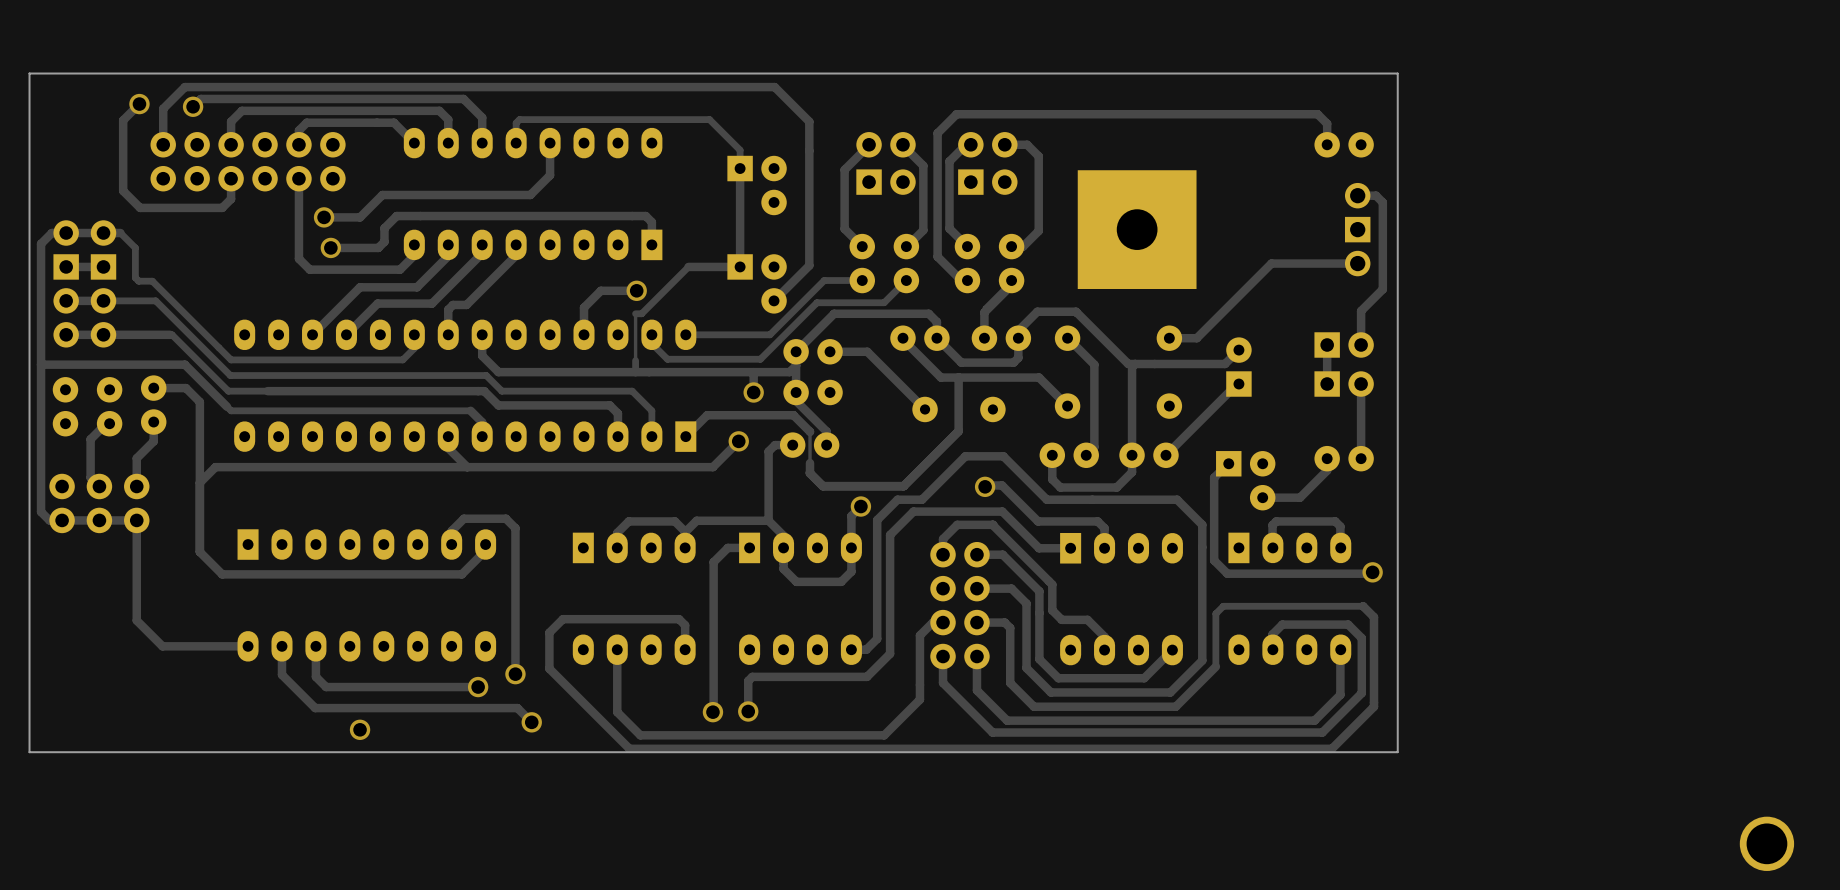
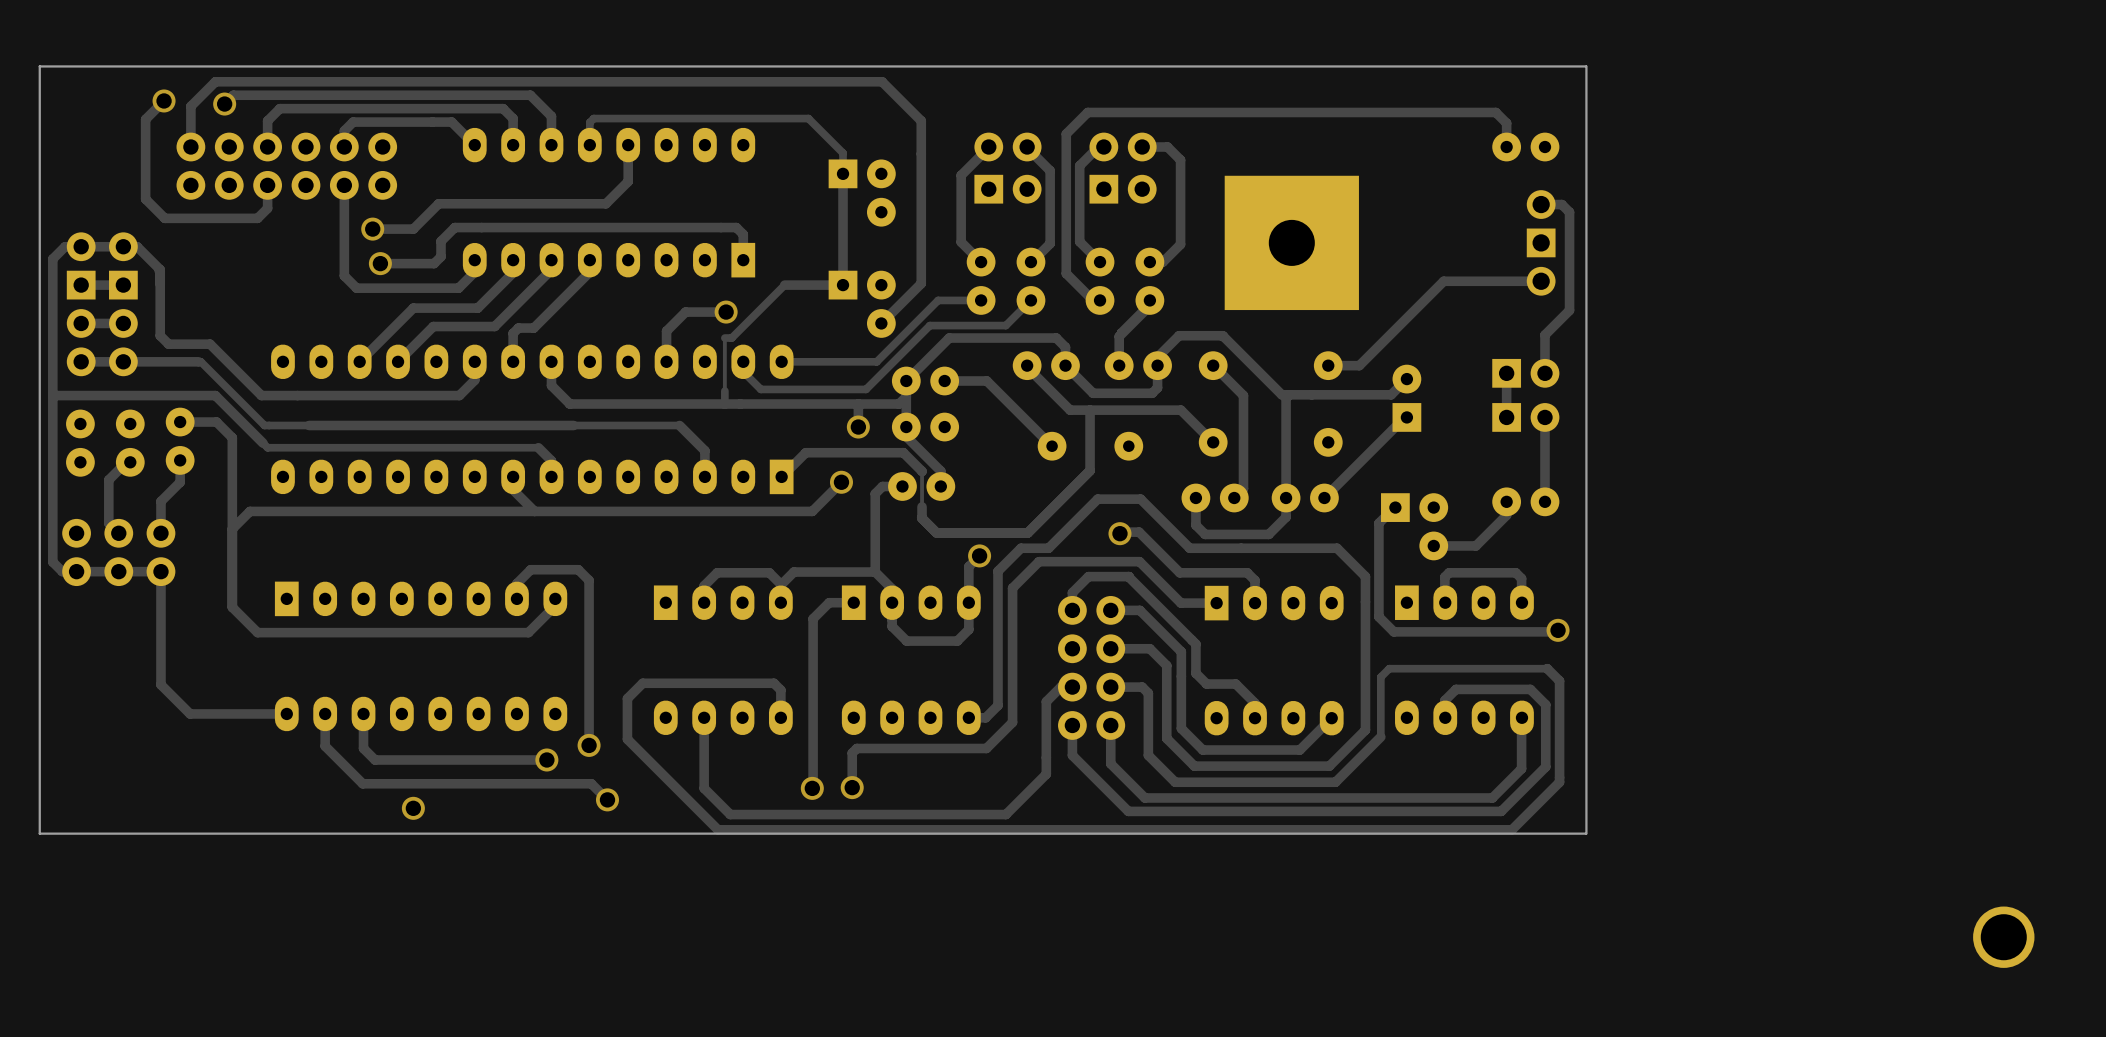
track: (115, 233) (120, 233) (135, 247) (135, 277) (138, 281) (152, 281) (231, 359) (402, 359) (414, 348) -> (137, 246) (160, 269) (160, 335) (168, 344) (210, 344) (261, 395) (459, 395) (474, 380) (474, 377)
track: (103, 300) (155, 300) (230, 375) (486, 375) (501, 391) -> none
track: (484, 391) (498, 405) (609, 405) -> (553, 425) (573, 425)
track: (595, 391) (632, 391) (651, 410) (651, 436) -> (679, 425) (695, 441)

